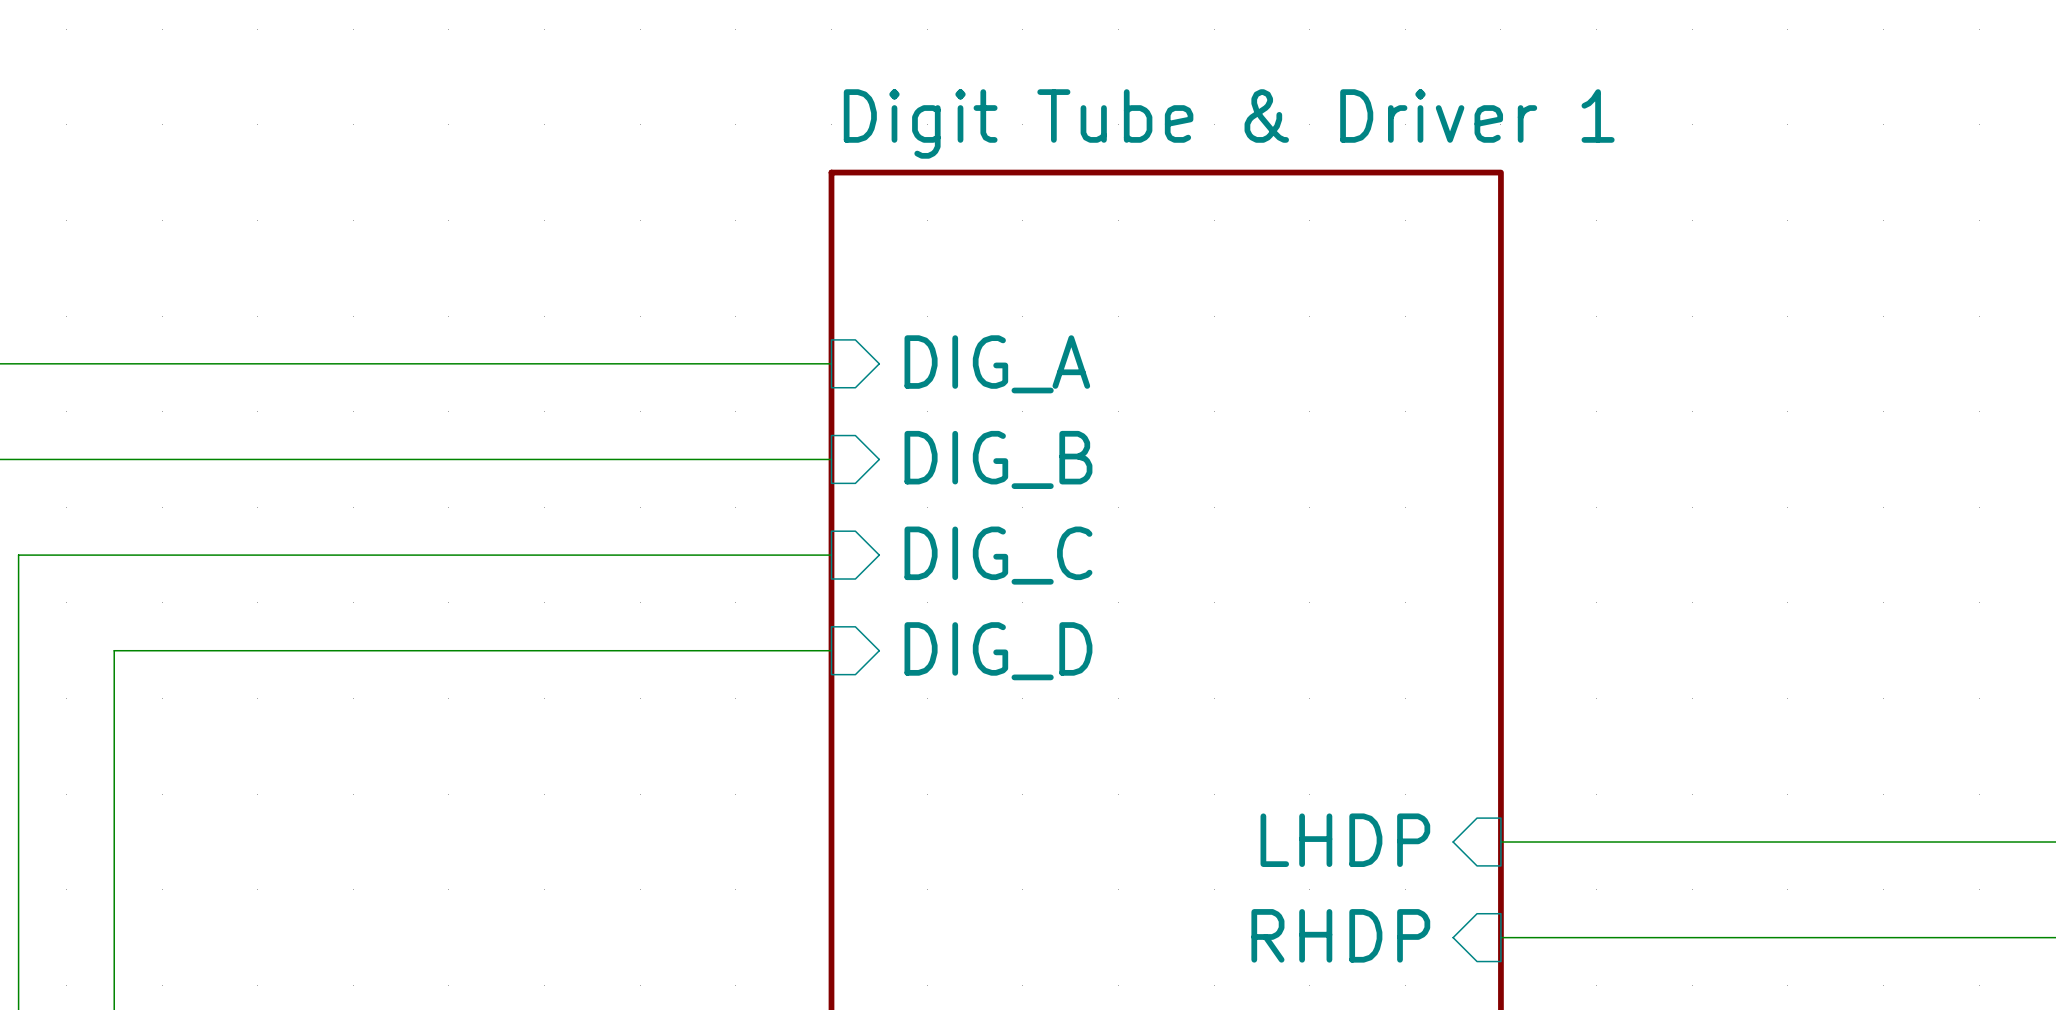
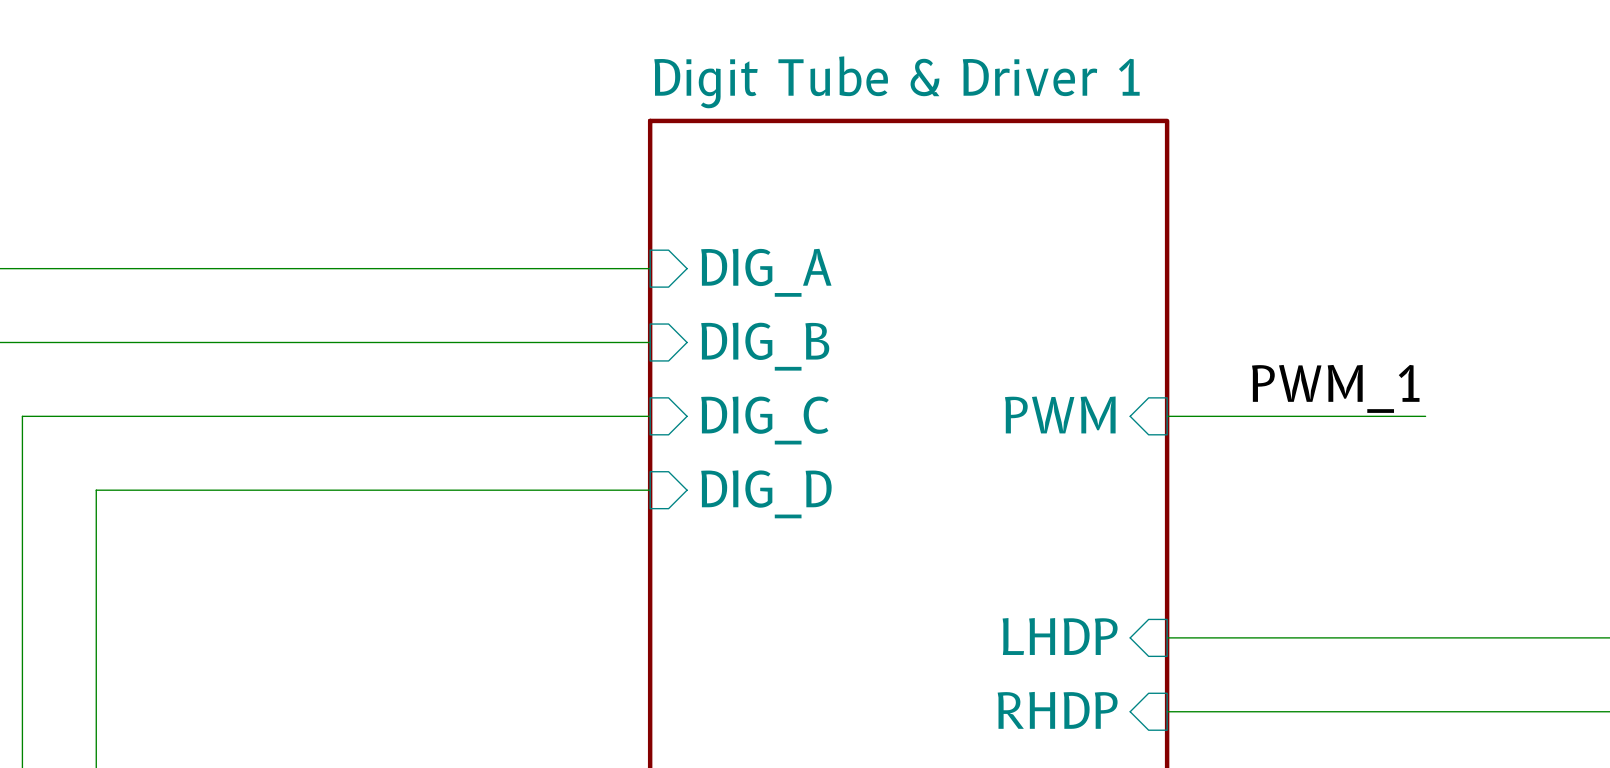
label: none -> PWM_1 (1335, 388)
sheet pin: none -> PWM (1060, 414)
wire: none -> (1167, 416) (1425, 416)

